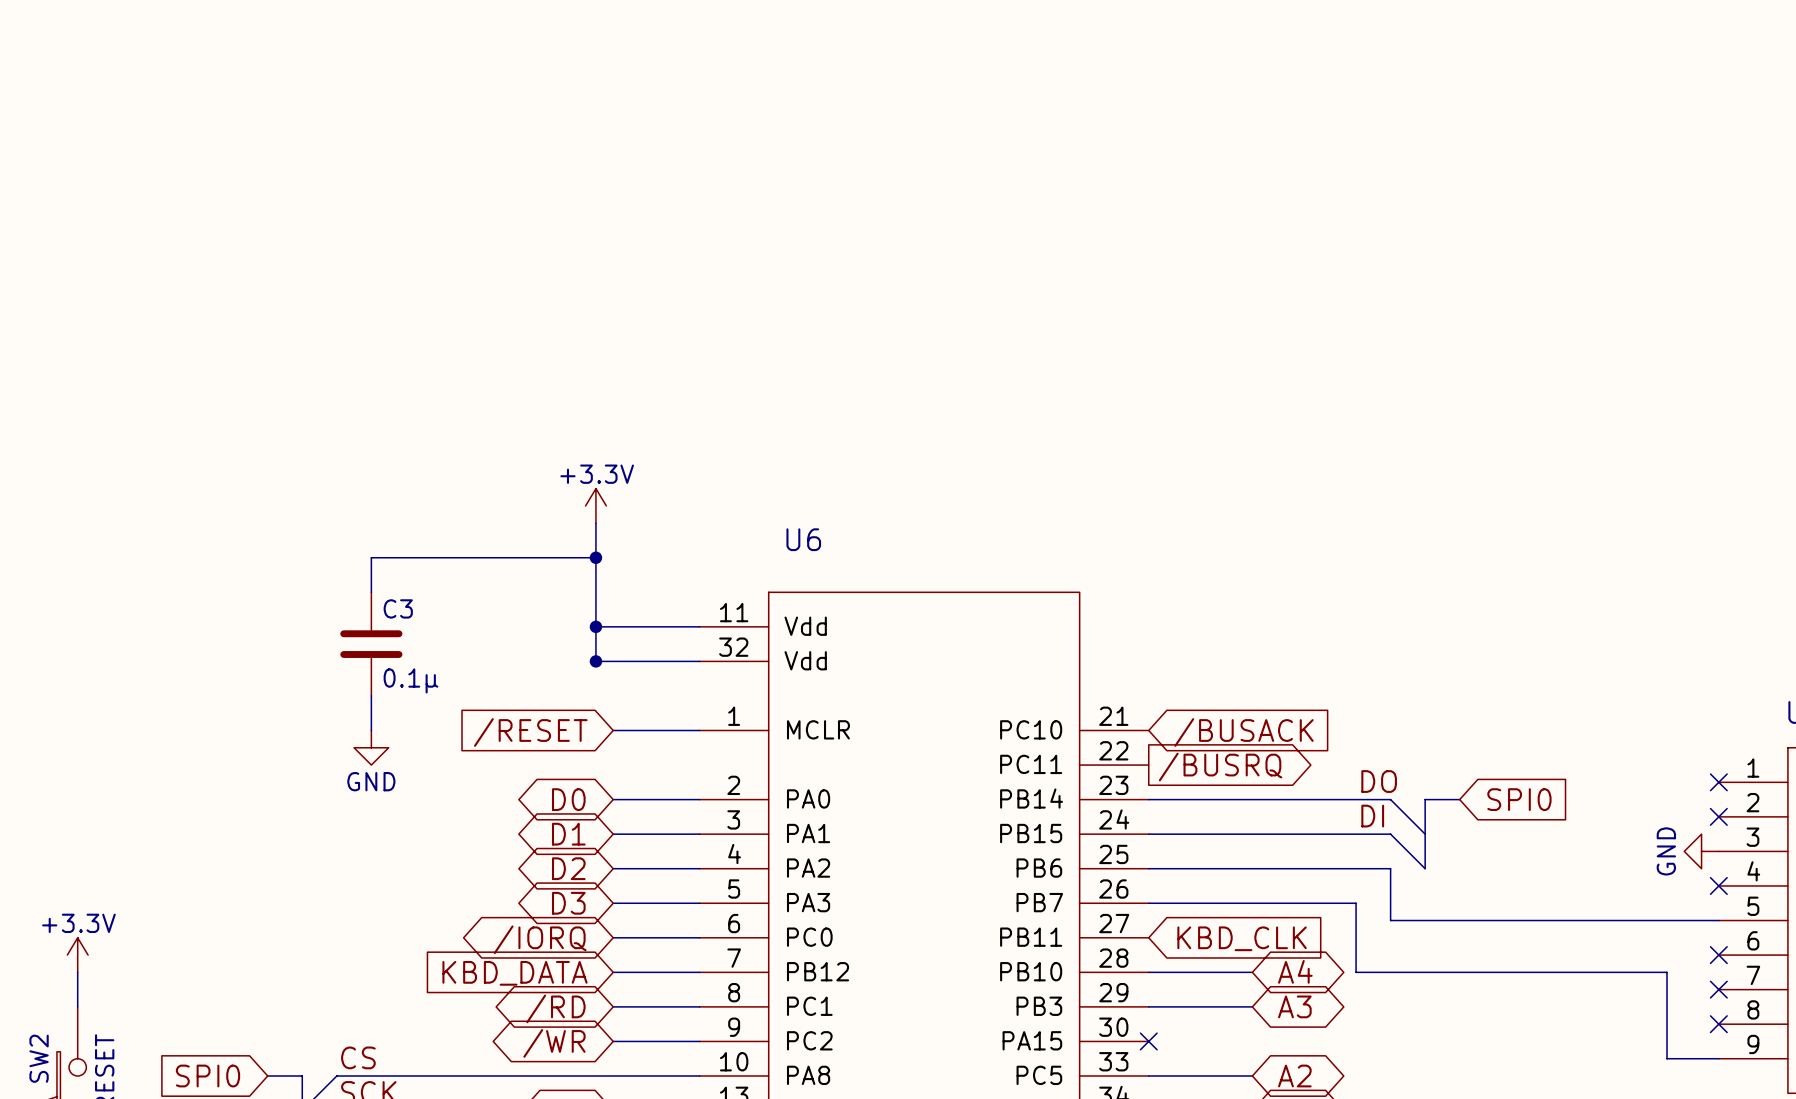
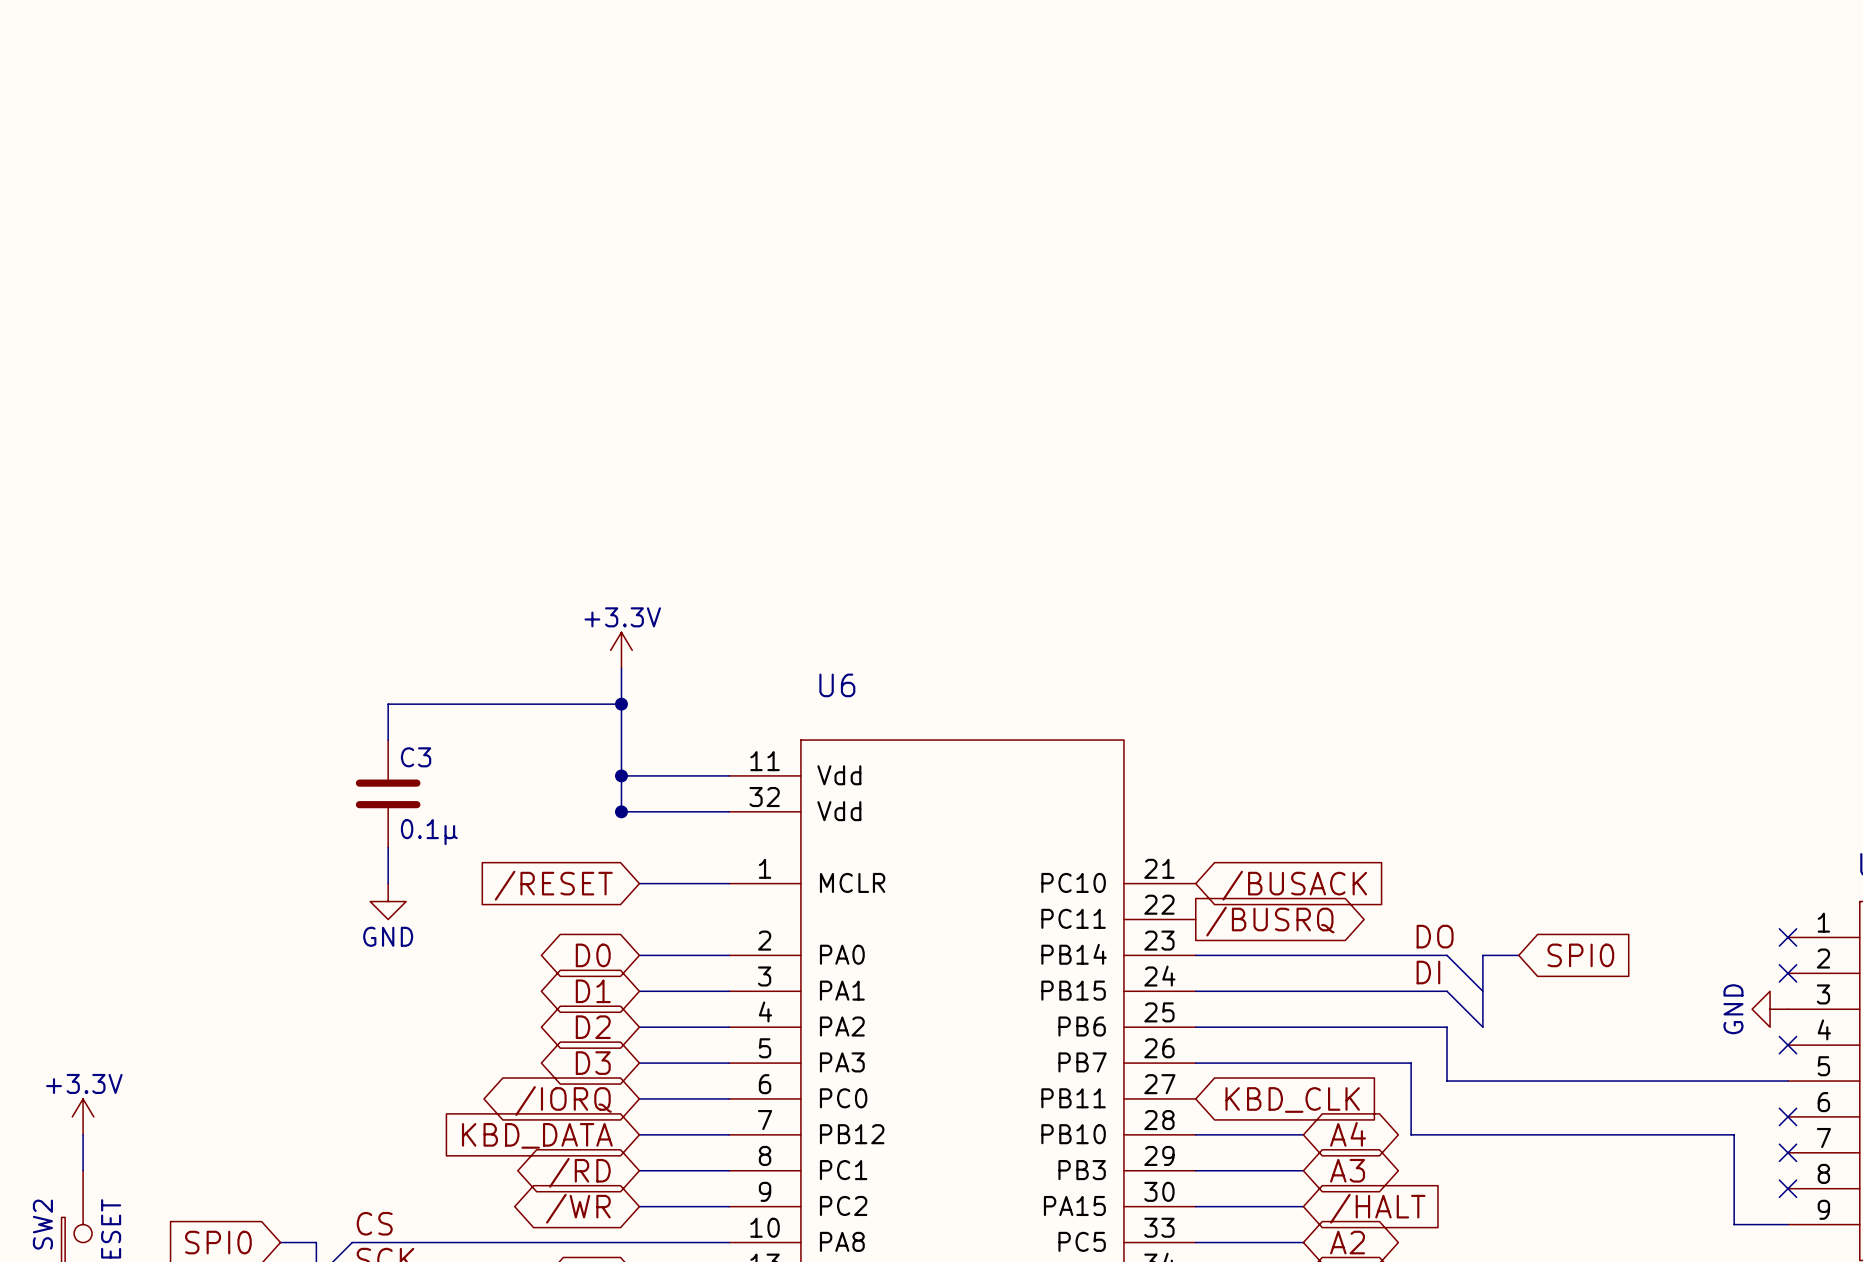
wire: none -> (1195, 1206) (1303, 1206)
no-connect mark: (1148, 1041) -> none
global label: none -> /HALT (1377, 1208)

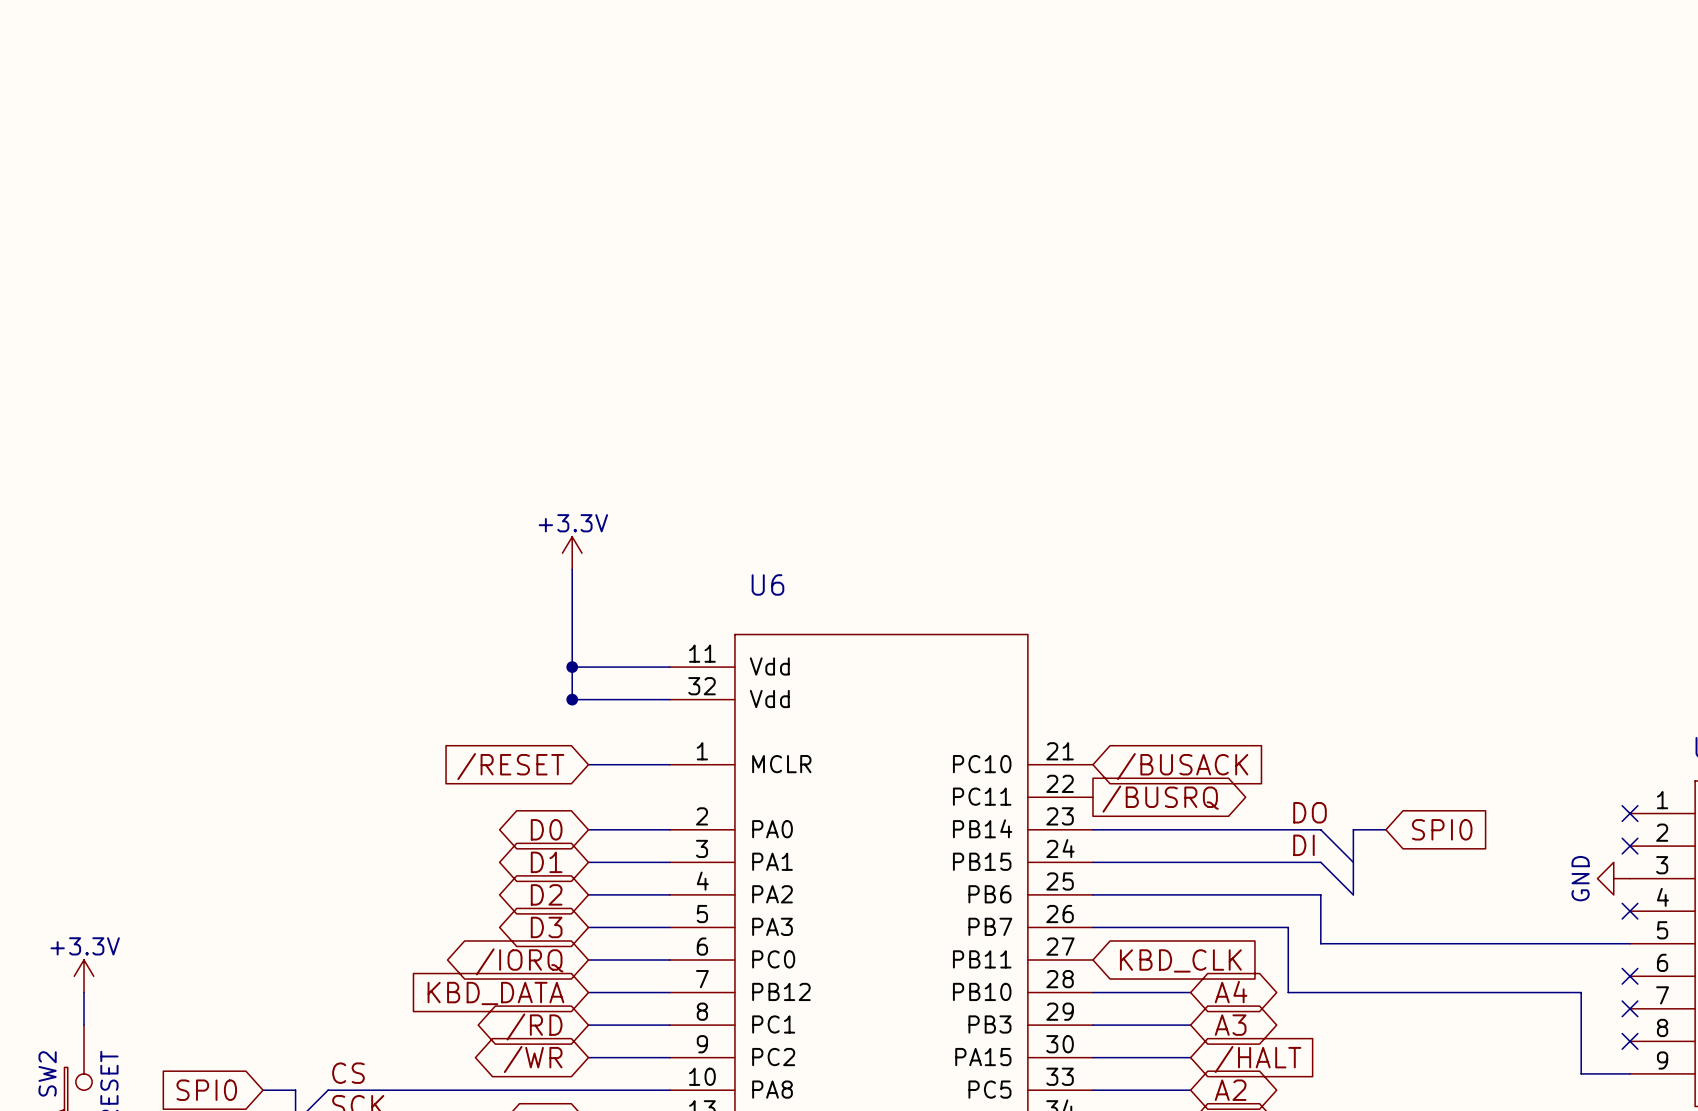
wire: (621, 704) (388, 704) (388, 740) -> none
junction: (621, 704) -> none
C3: 0.1µ (388, 793) -> none
wire: (388, 847) (388, 883) -> none
power symbol: GND (388, 901) -> none

